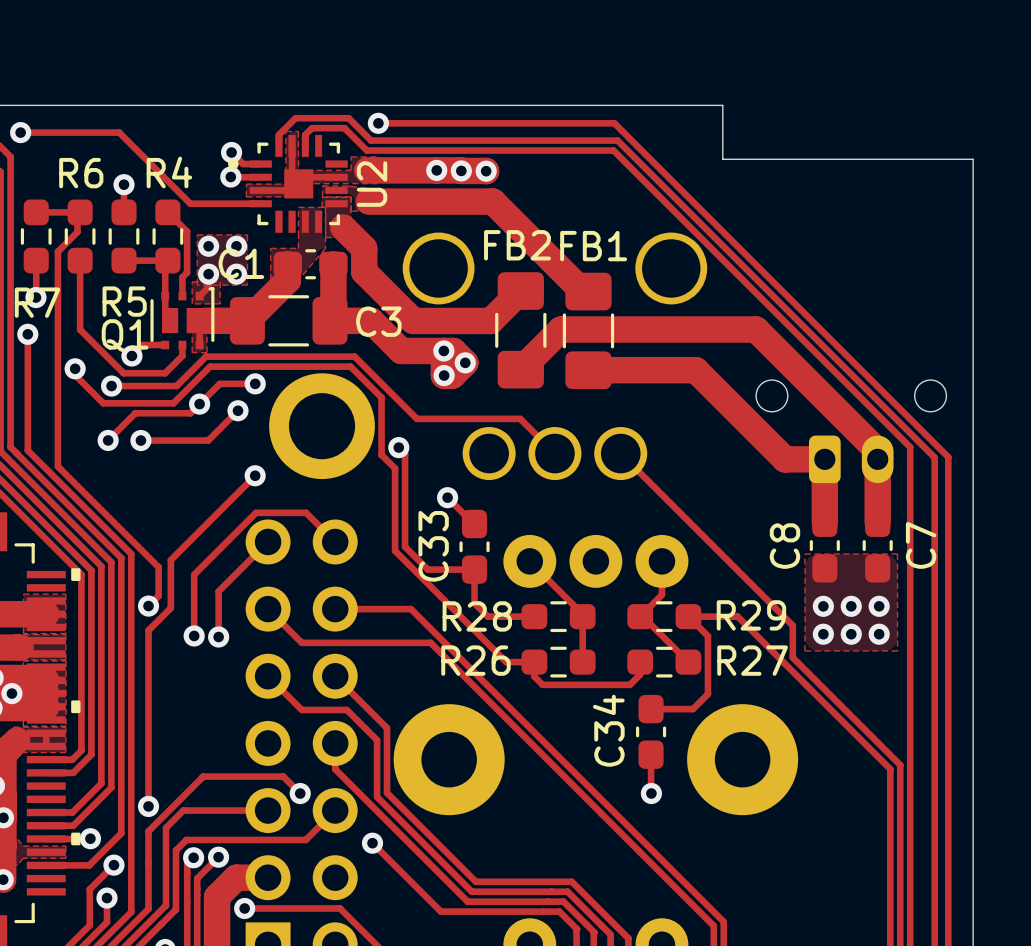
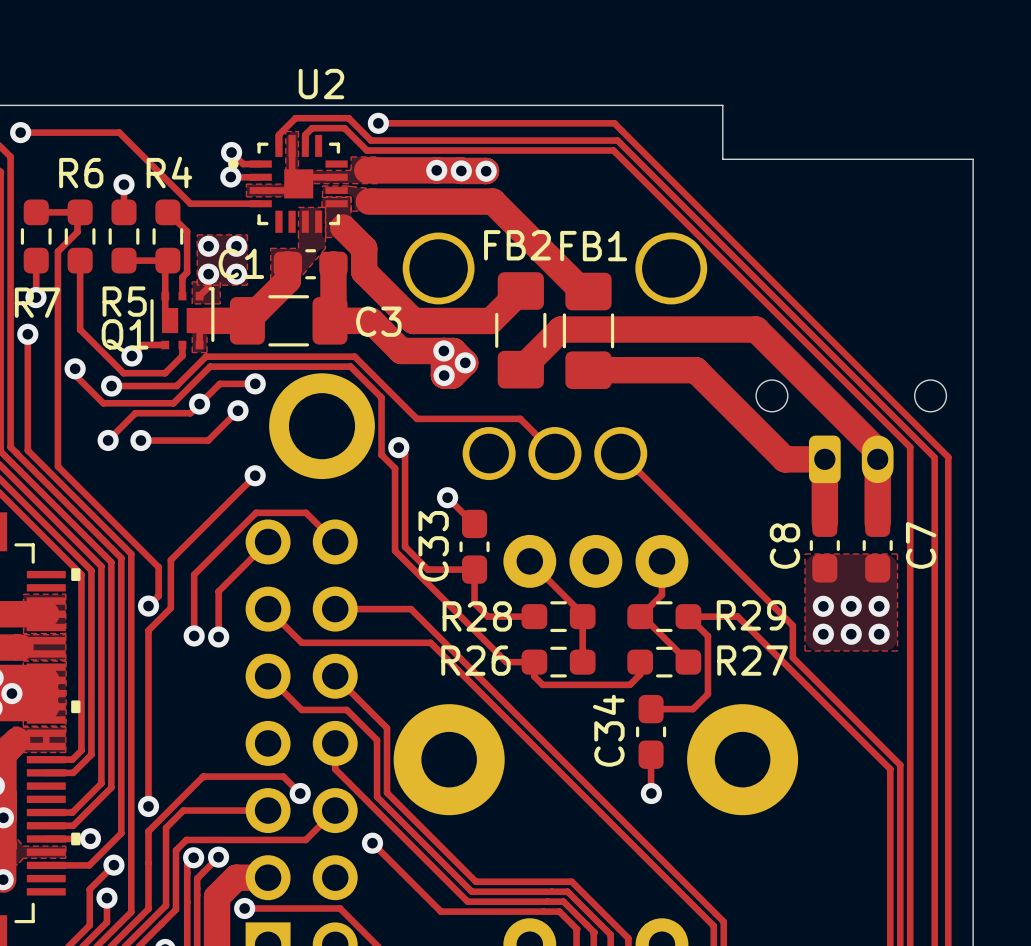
U2 name rotation: 0° (372, 184) -> 90° clockwise (321, 84)
U2 name position: U2 (372, 184) -> U2 (321, 84)

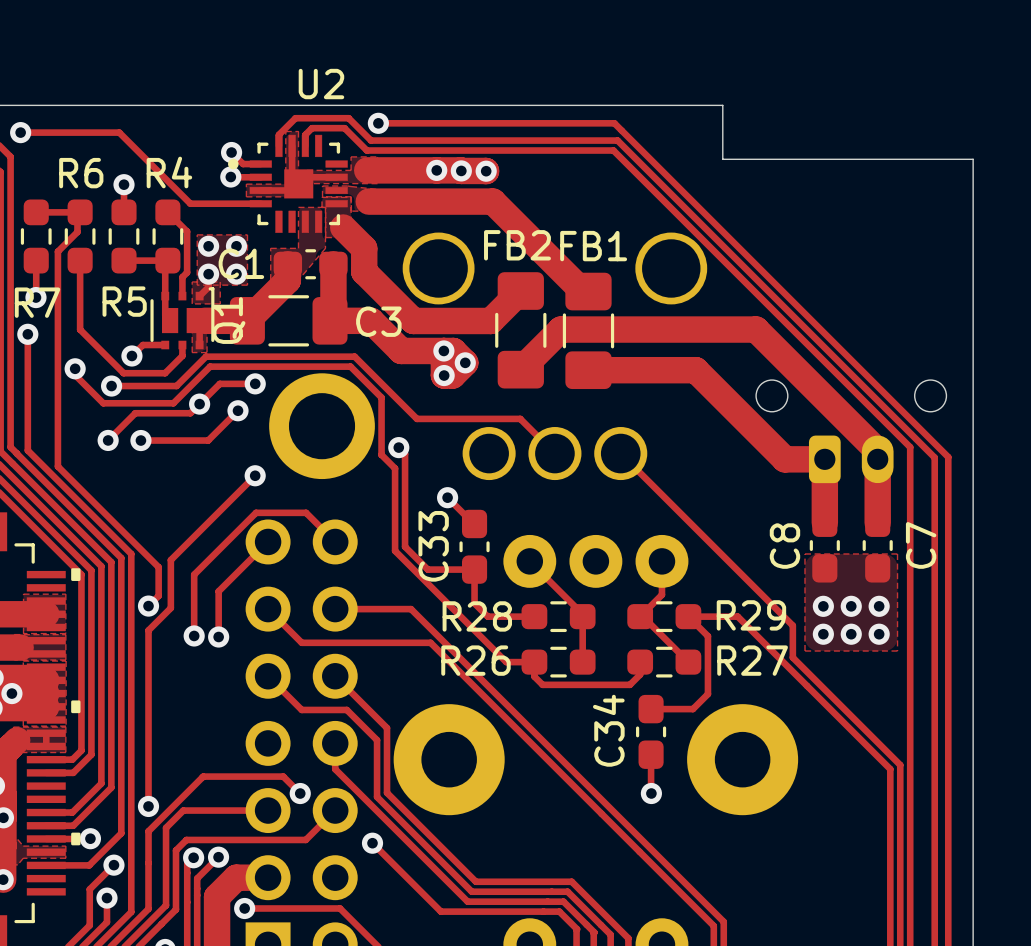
Q1 name rotation: 0° (125, 335) -> 90° counterclockwise (228, 320)
Q1 name position: Q1 (125, 335) -> Q1 (228, 320)

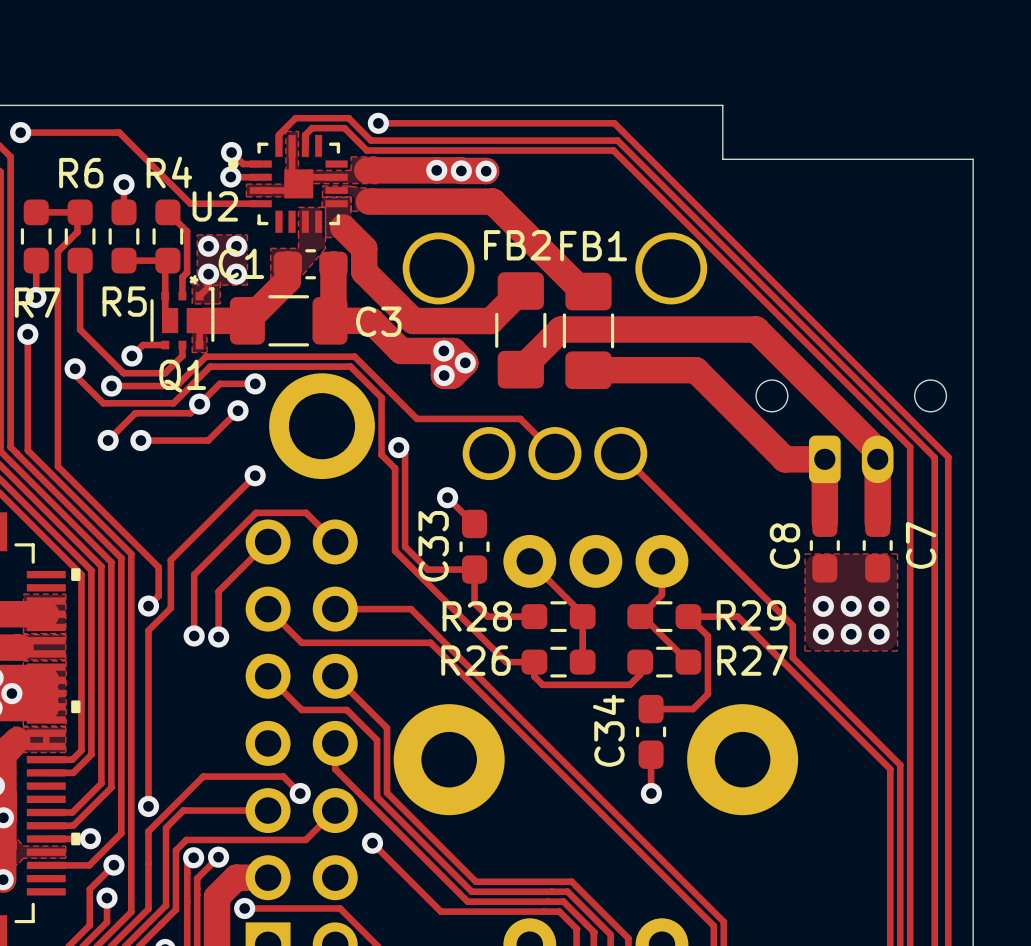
U2 name position: U2 (321, 84) -> U2 (215, 206)
Q1 text: none -> * (194, 279)
Q1 name rotation: 0° (228, 320) -> 90° clockwise (182, 376)
Q1 name position: Q1 (228, 320) -> Q1 (182, 376)

